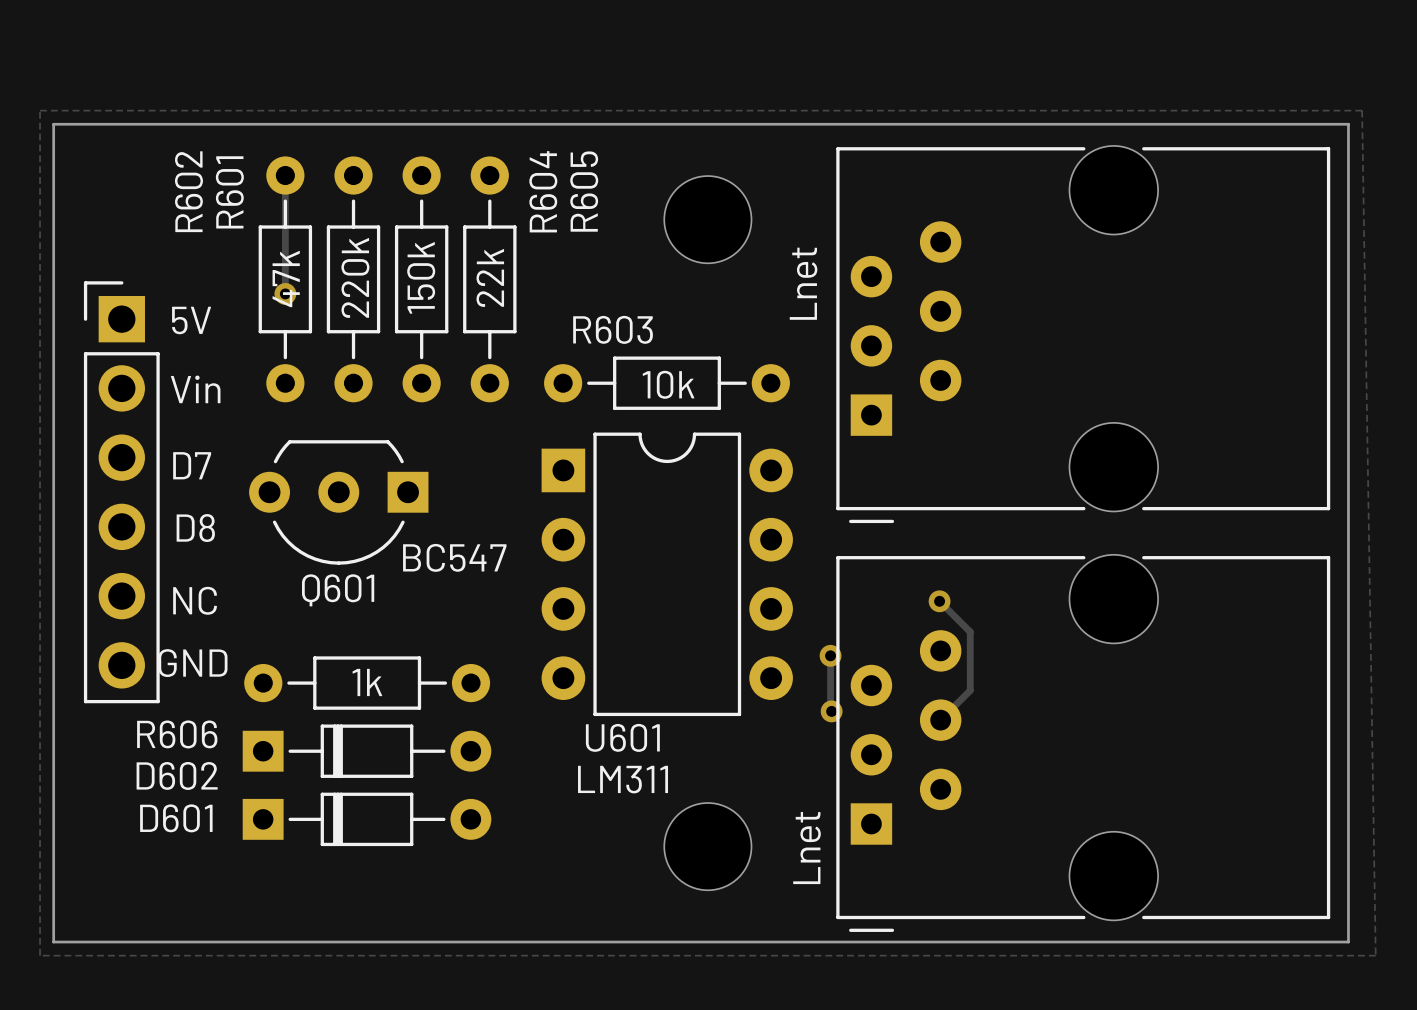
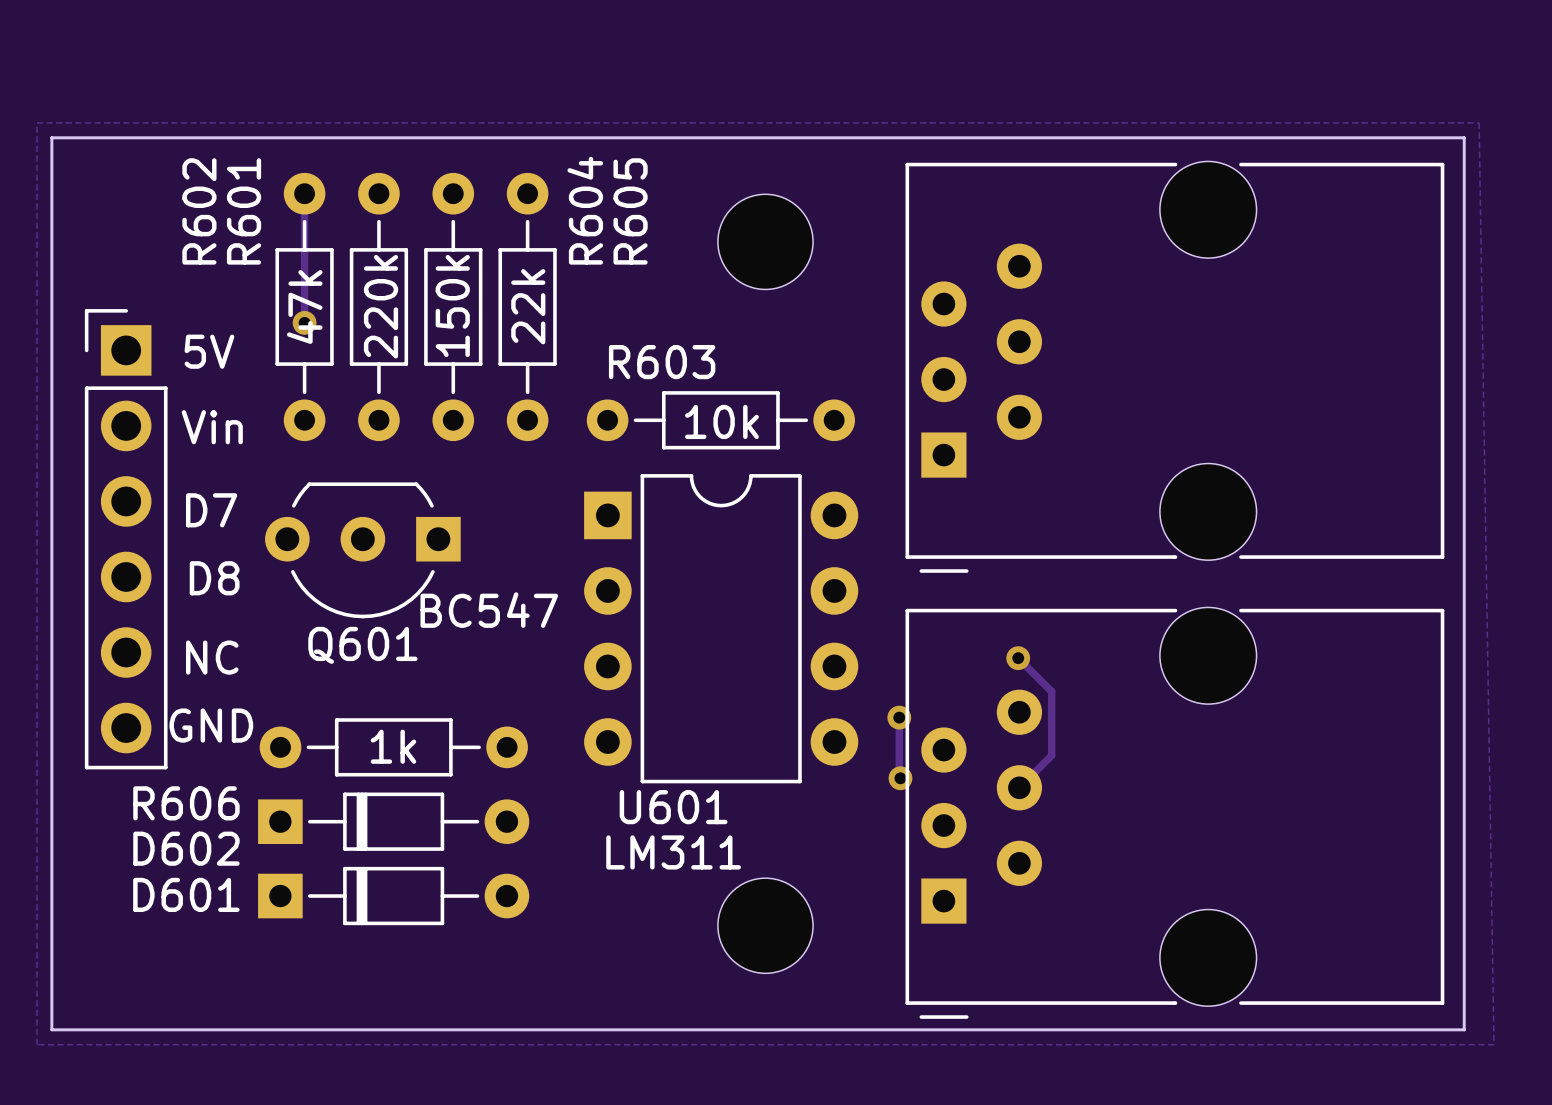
text: Lnet (803, 283) -> none
text: Lnet (807, 848) -> none

